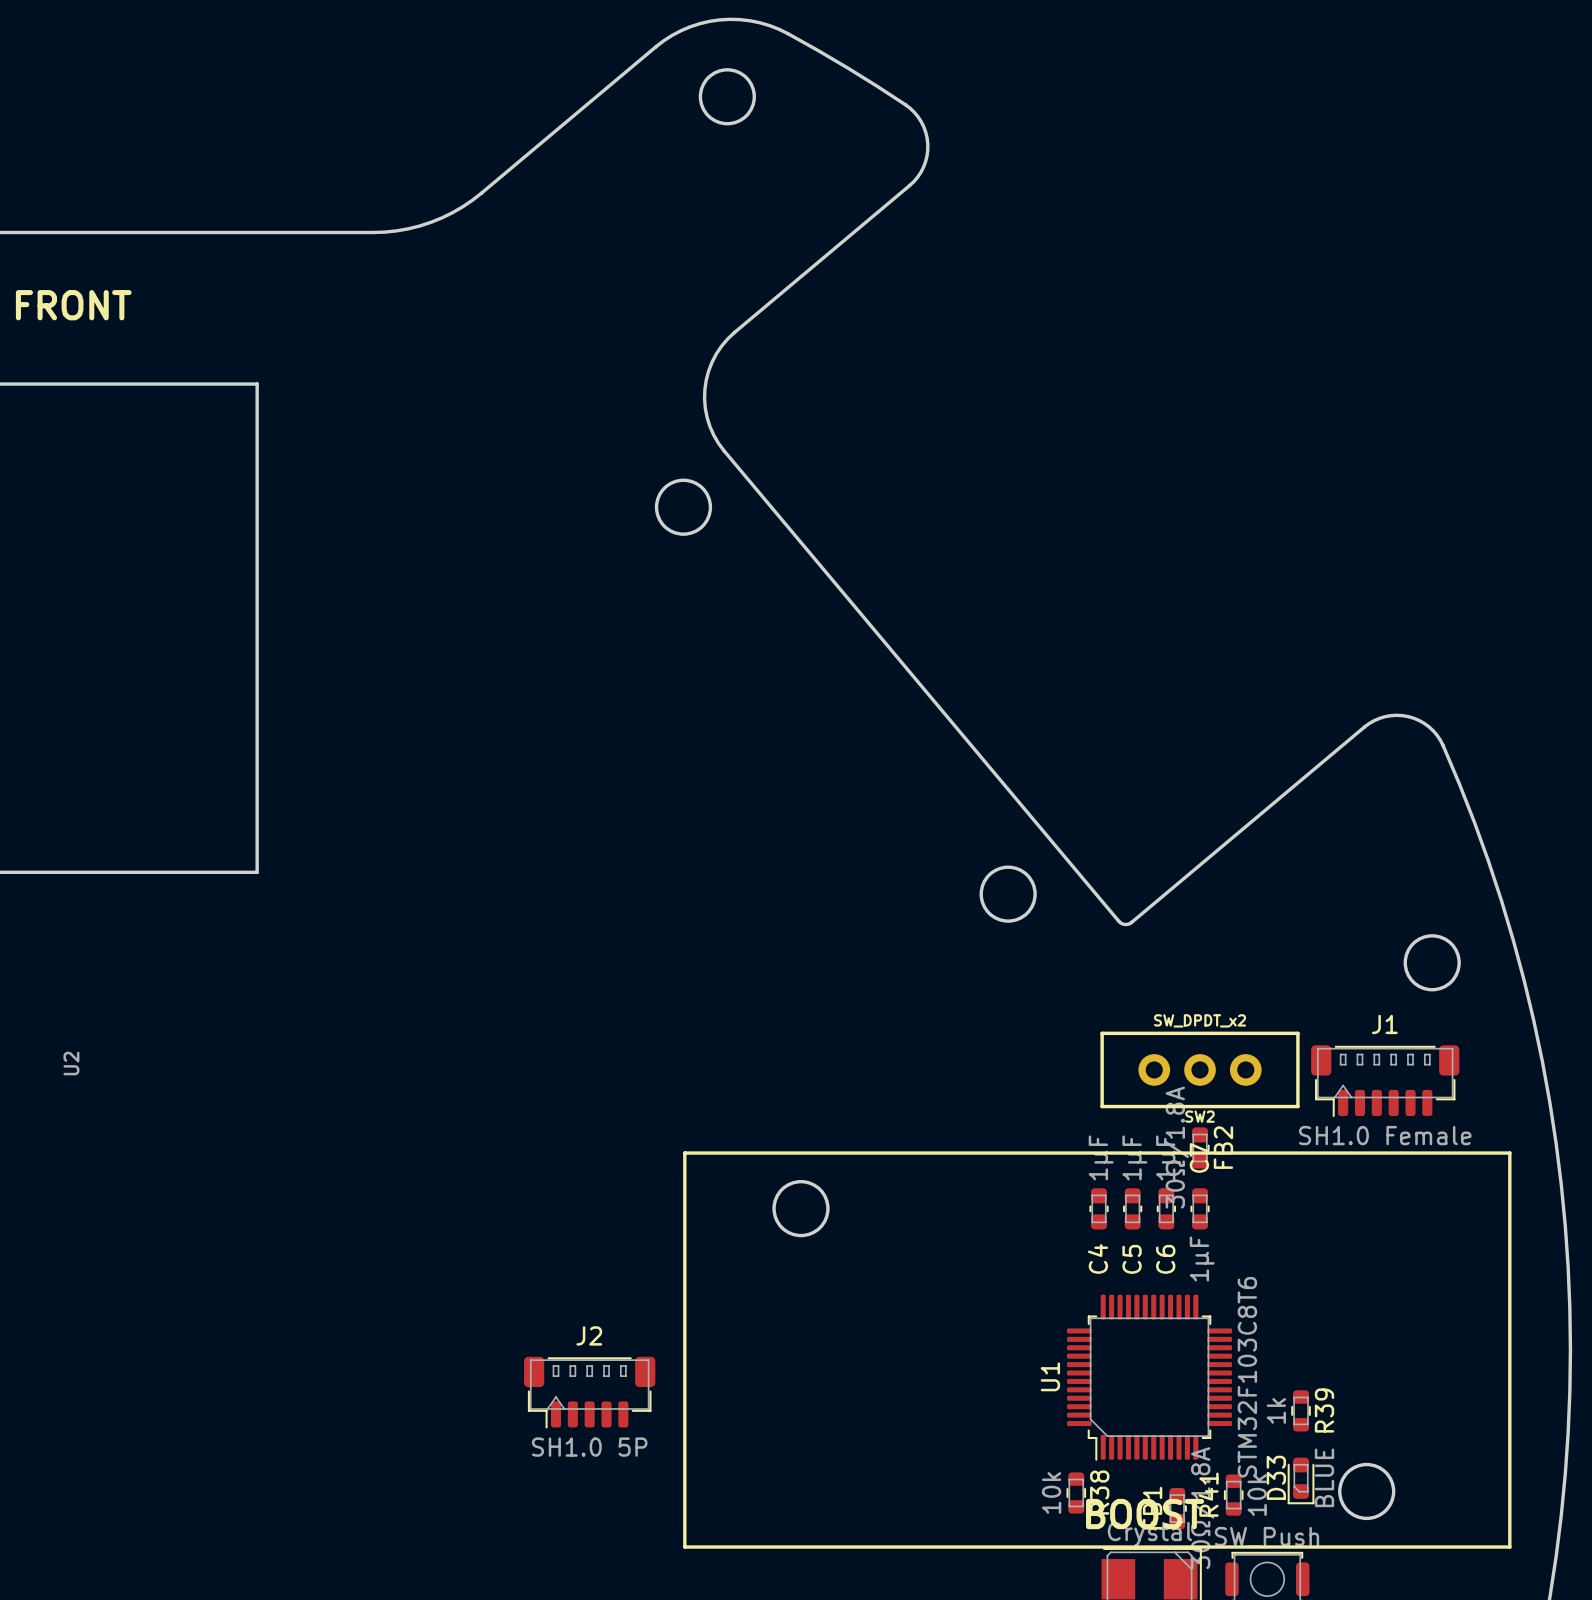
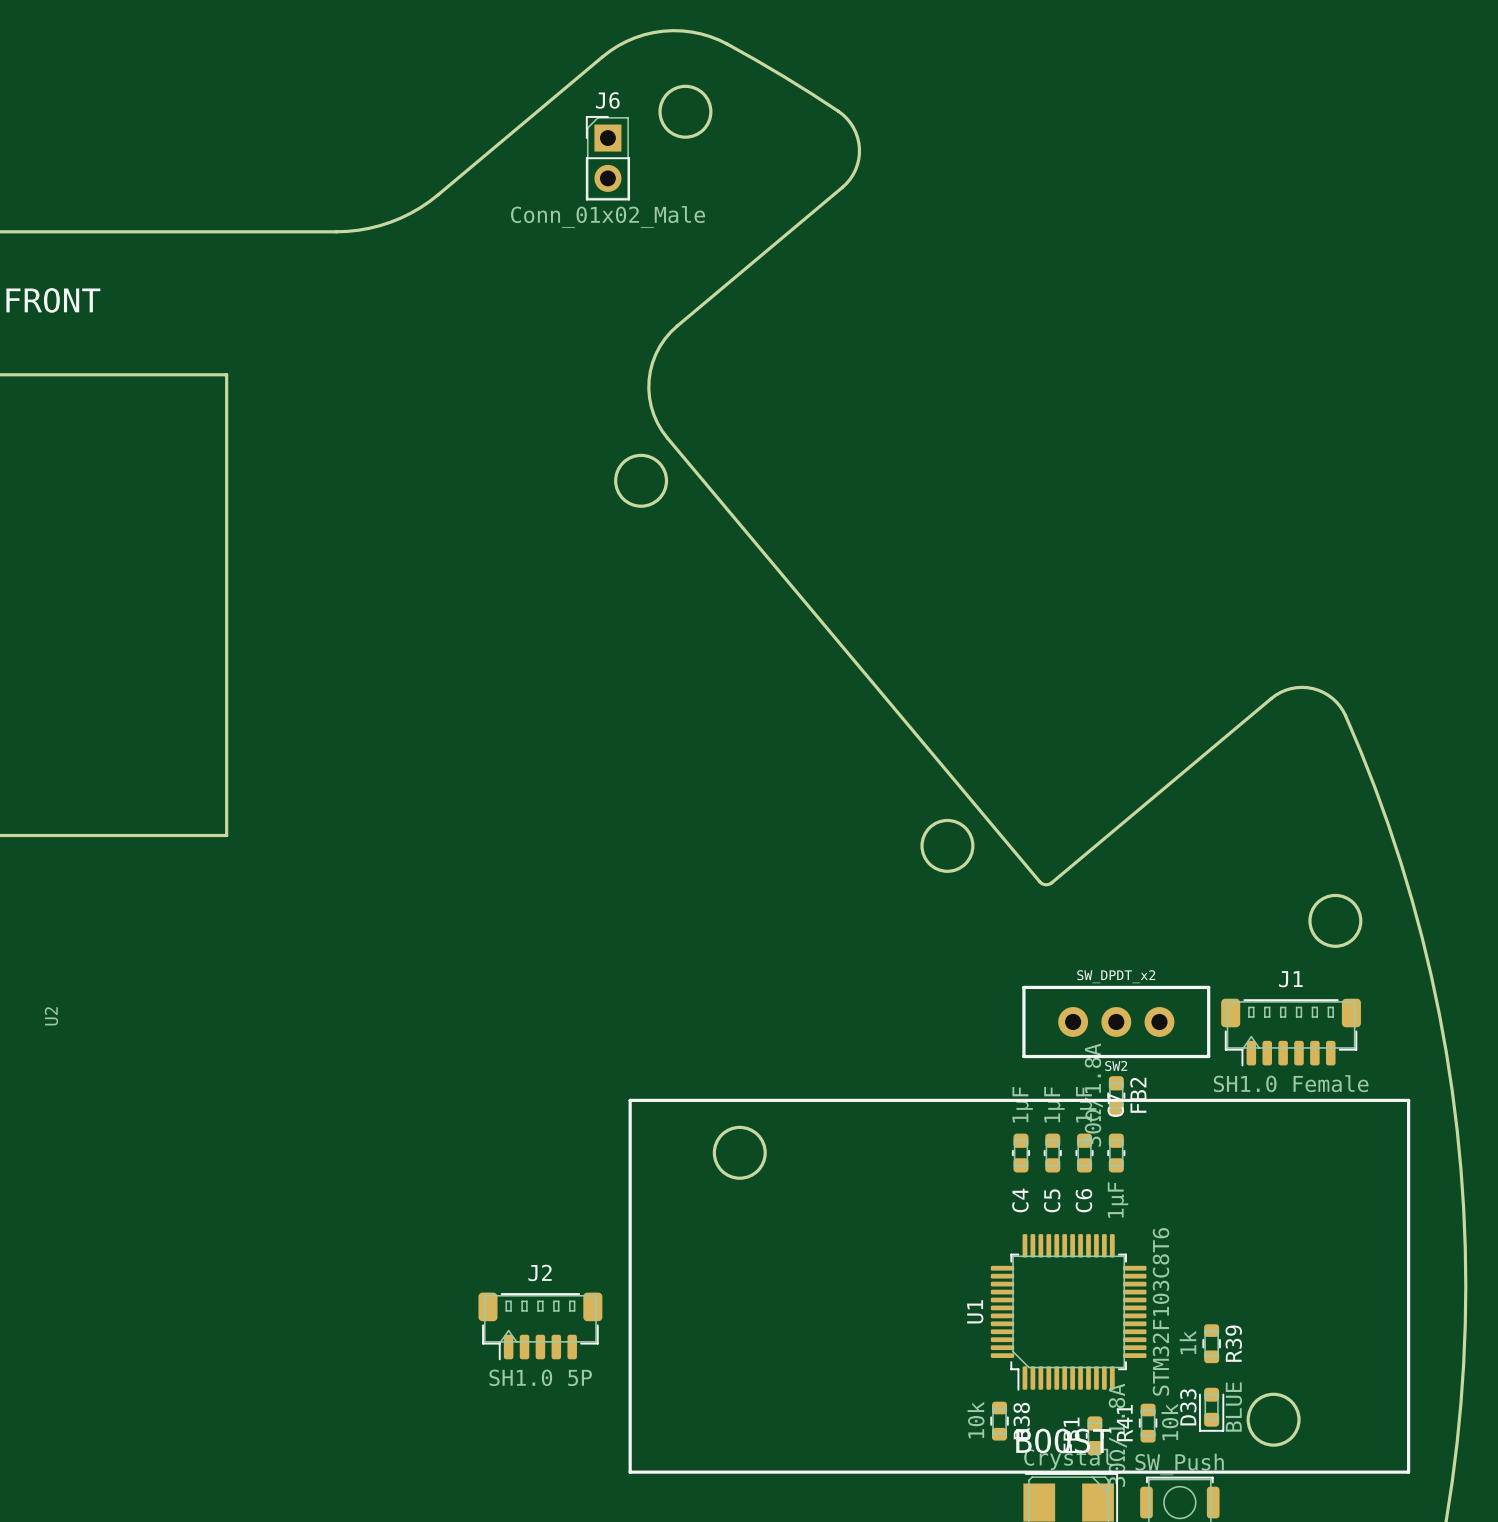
round board edge position: (727, 96) -> (685, 111)
J6: none -> Conn_01x02_Male (607, 158)
round board edge position: (683, 507) -> (641, 480)
round board edge position: (1008, 894) -> (947, 845)

